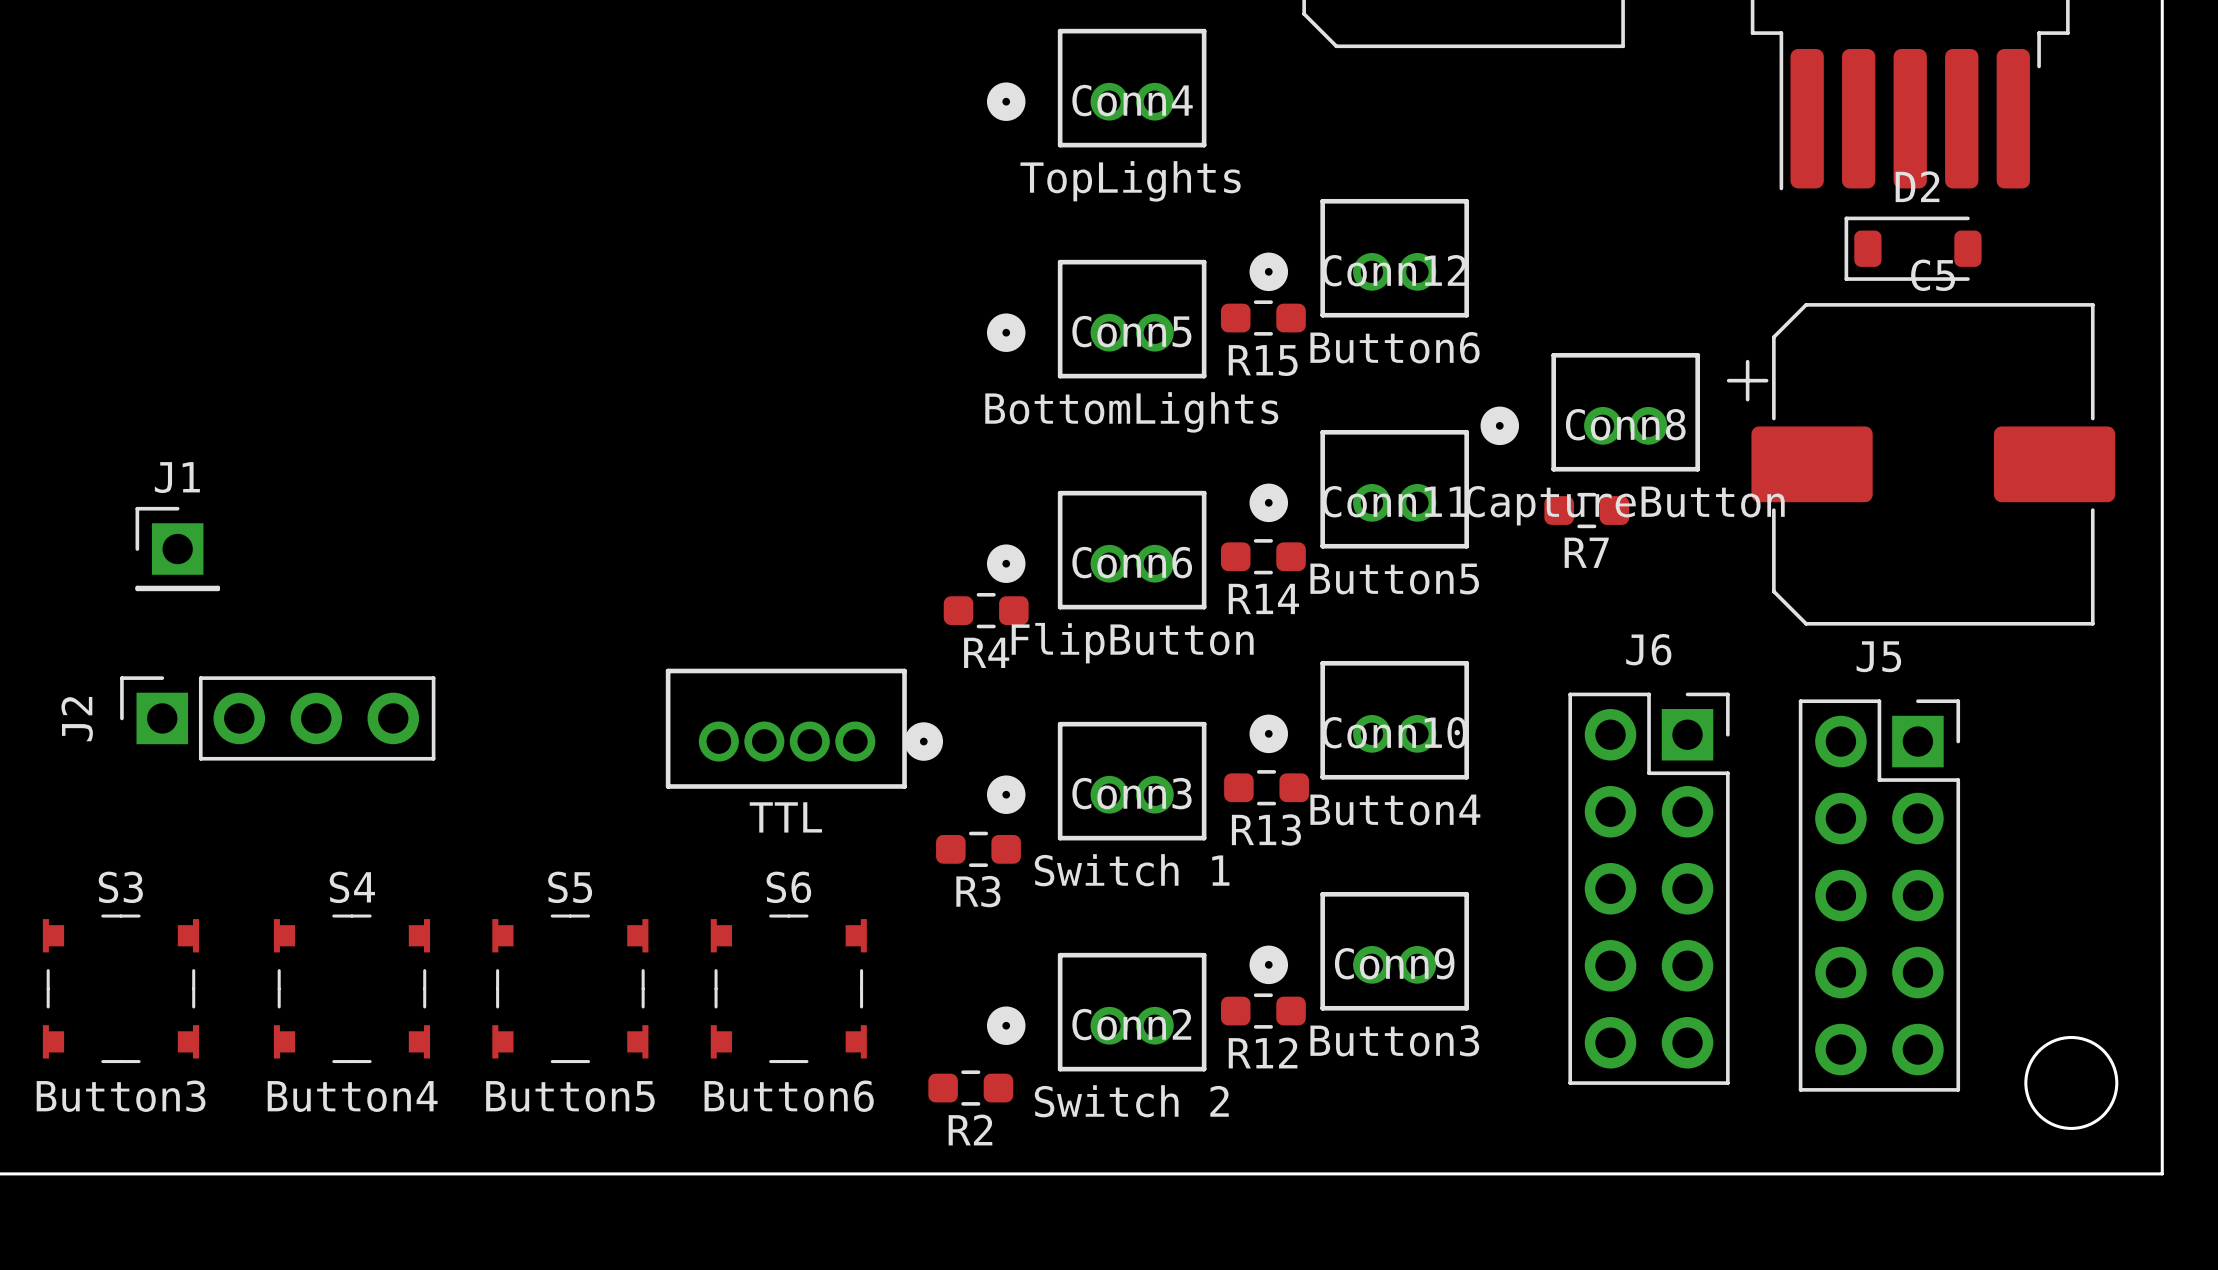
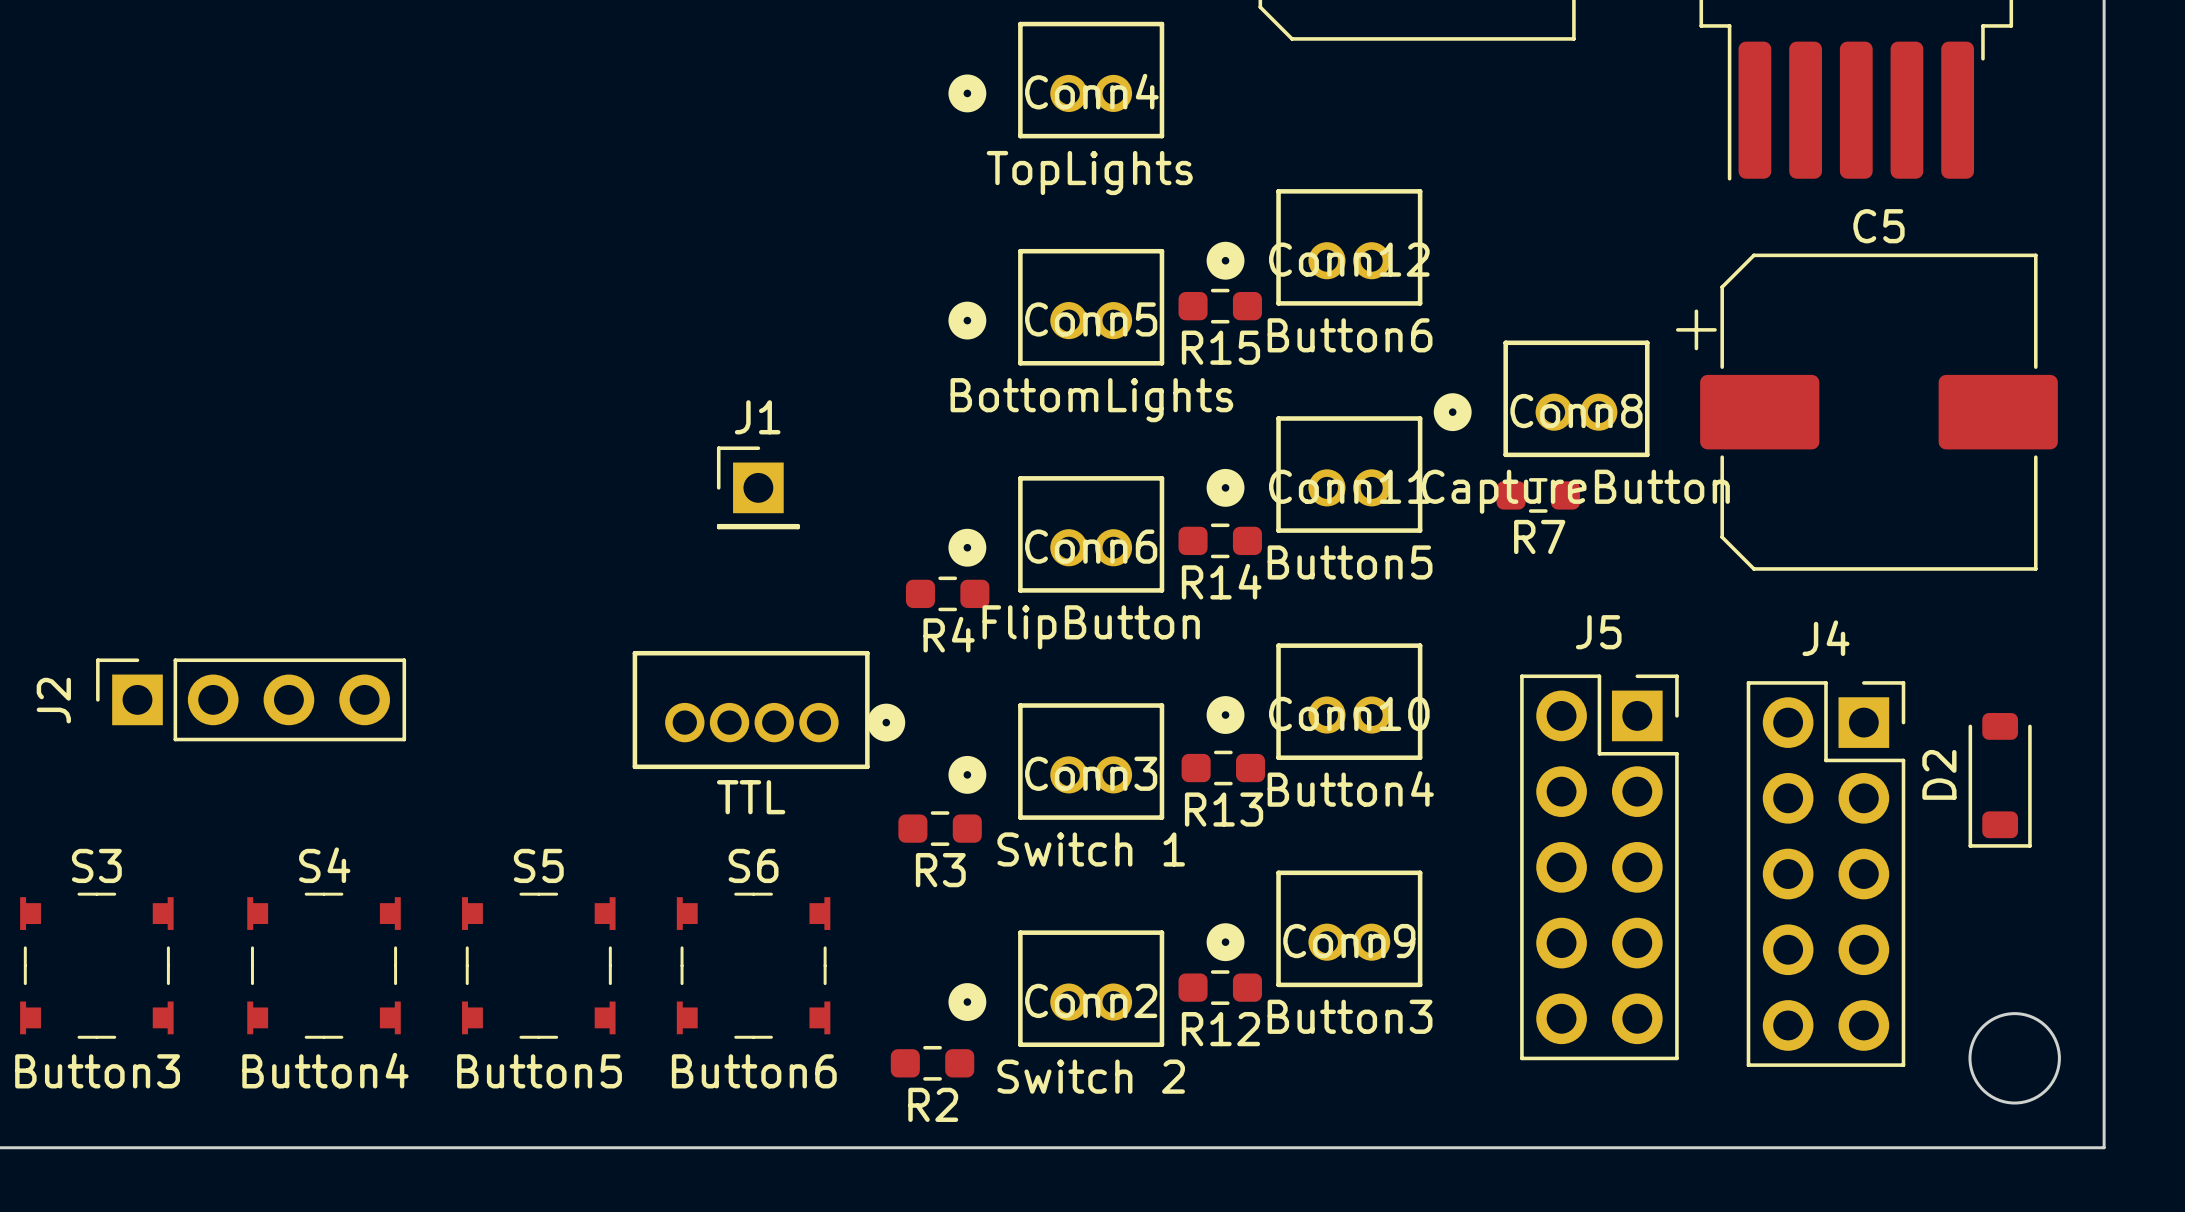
D2 rotation: 0° (1913, 248) -> 90° counterclockwise (2000, 780)
D2 position: (1913, 248) -> (2000, 780)
C5 position: (1921, 464) -> (1866, 412)
J1 position: (177, 549) -> (758, 487)
J6 name: J6 (1648, 649) -> J5 (1598, 632)
J5 name: J5 (1878, 656) -> J4 (1825, 638)

